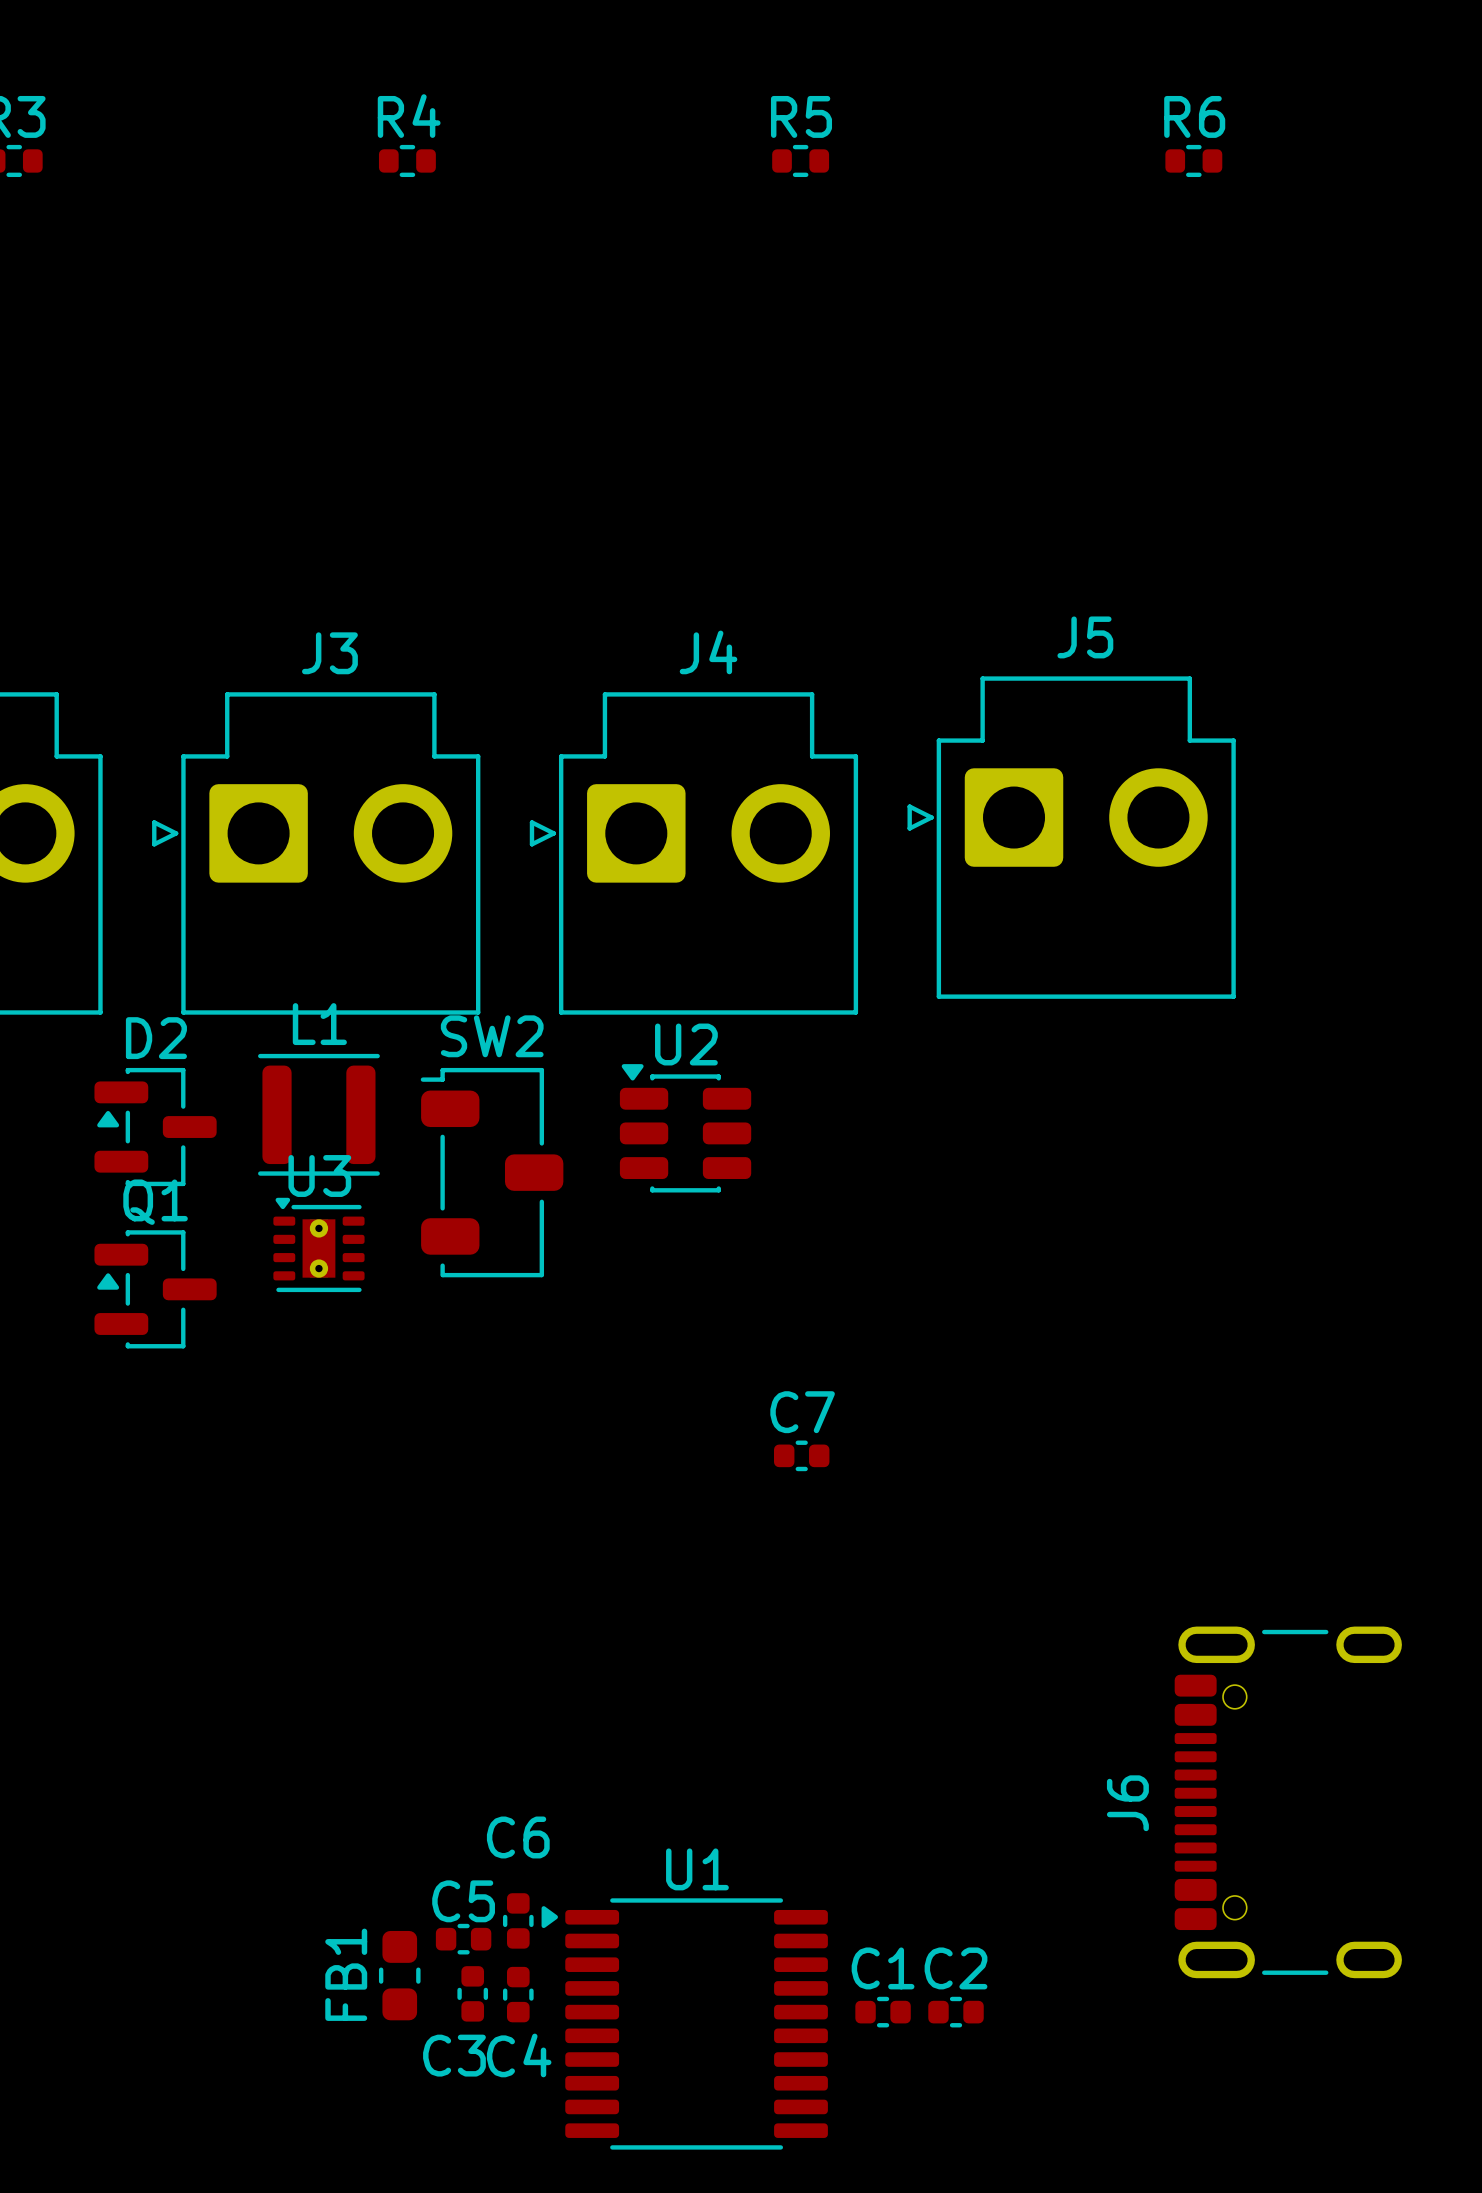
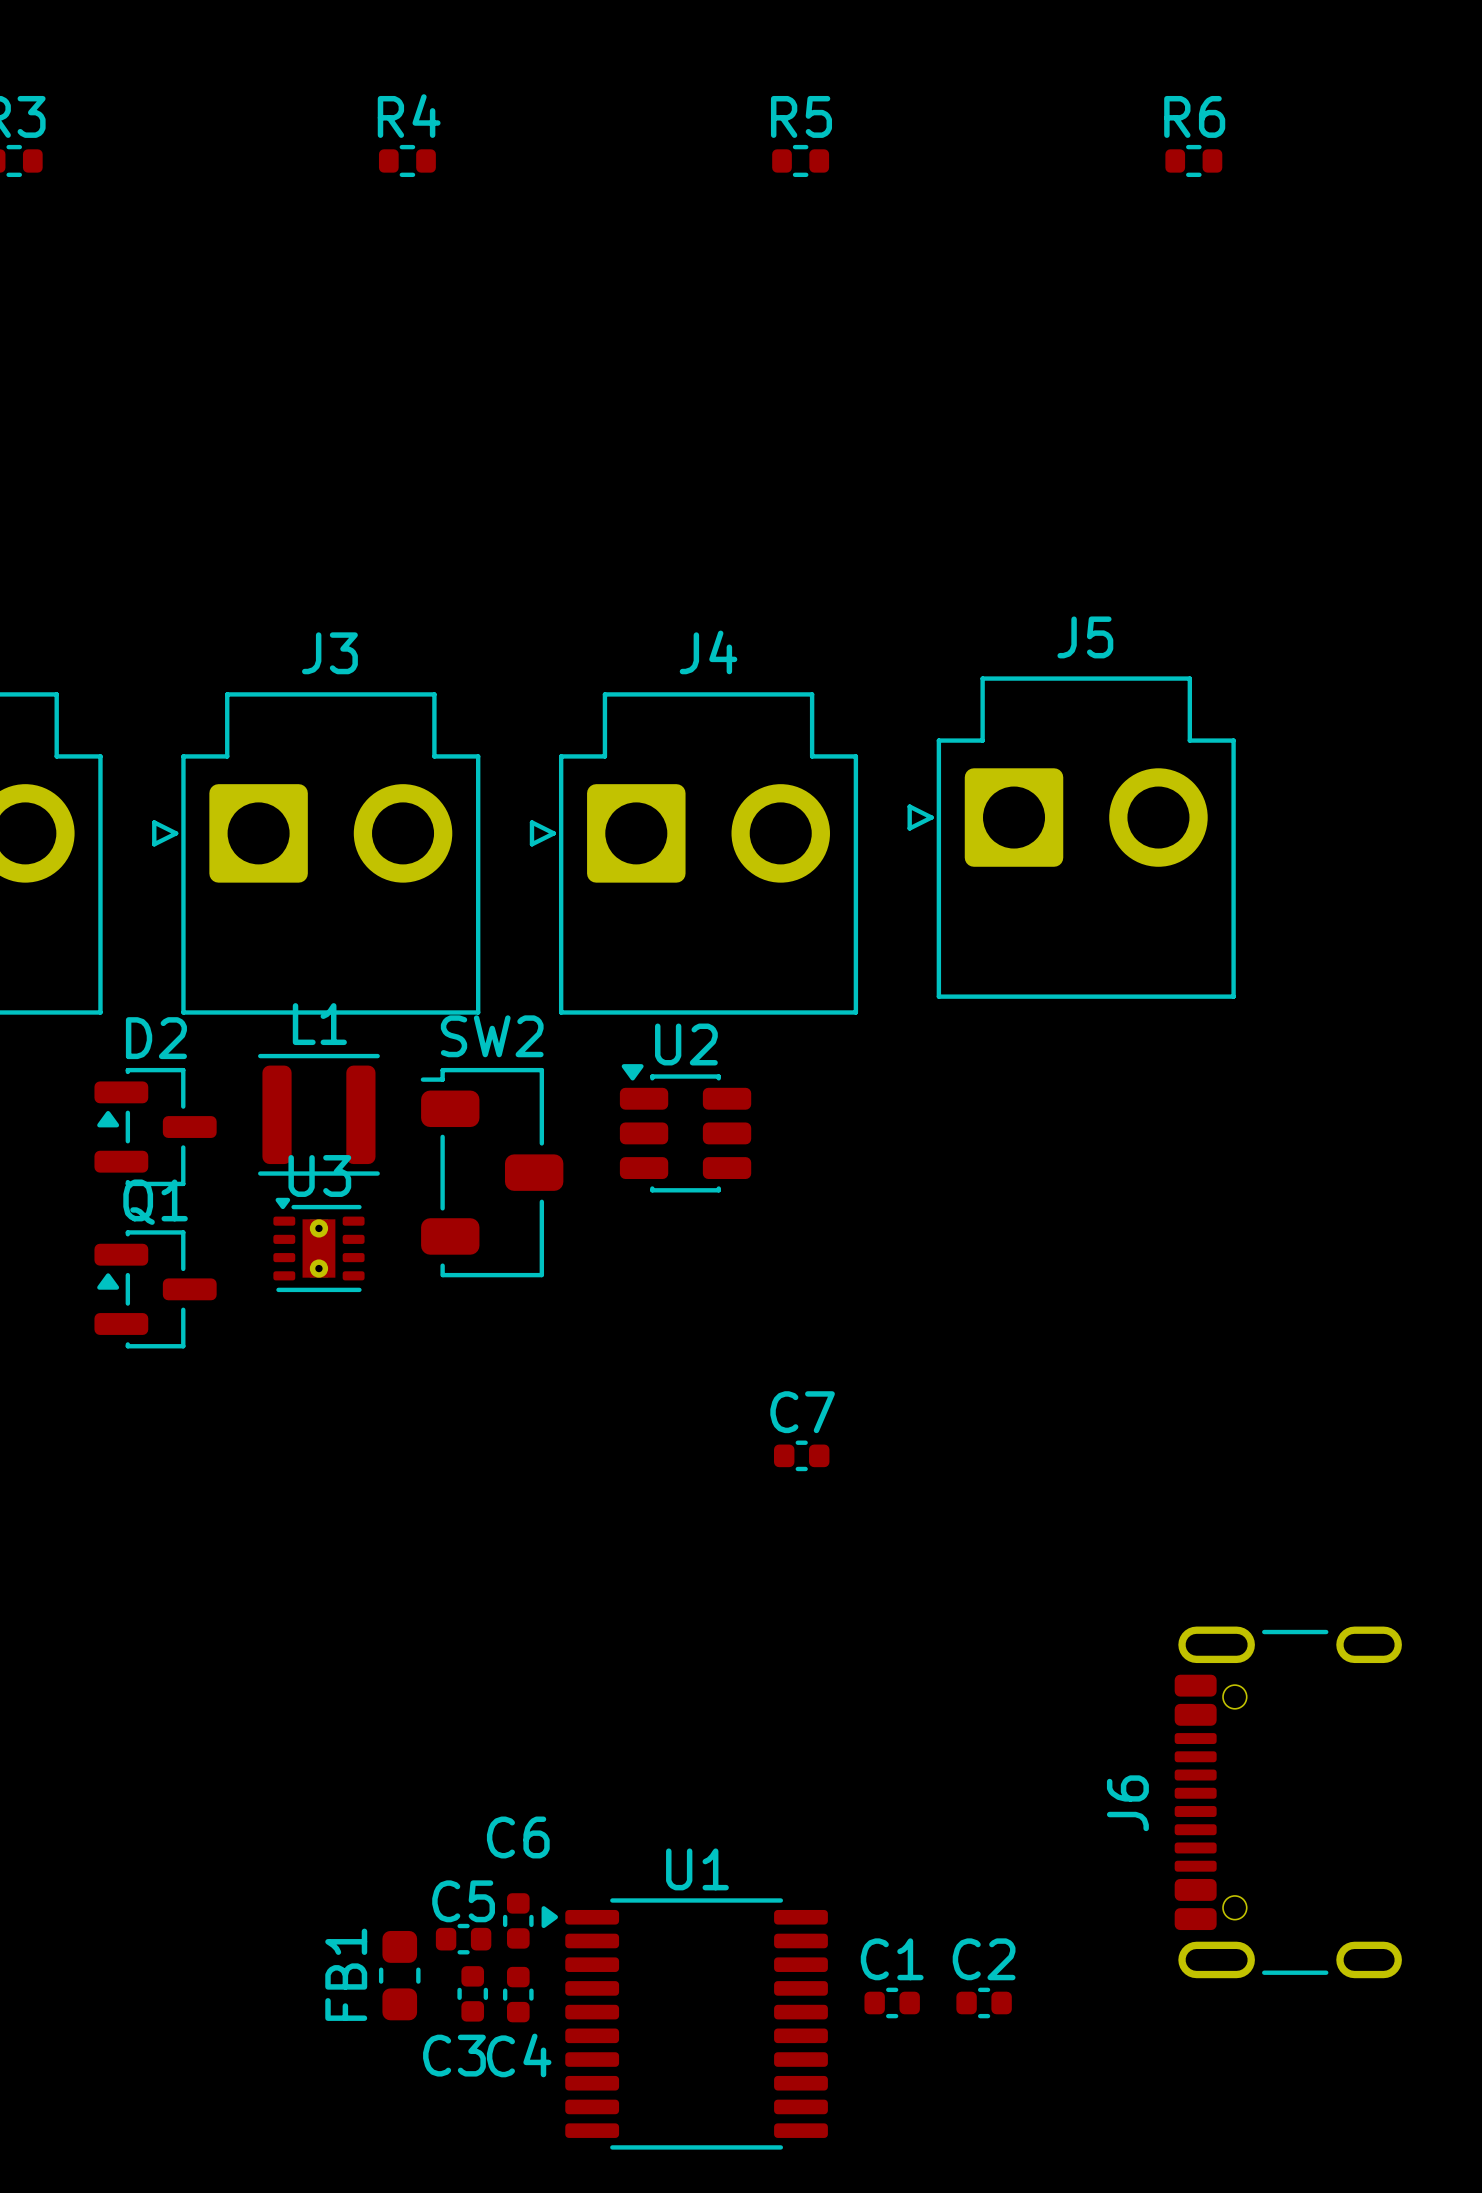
C1 position: (883, 2012) -> (892, 2002)
C2 position: (956, 2012) -> (984, 2002)

